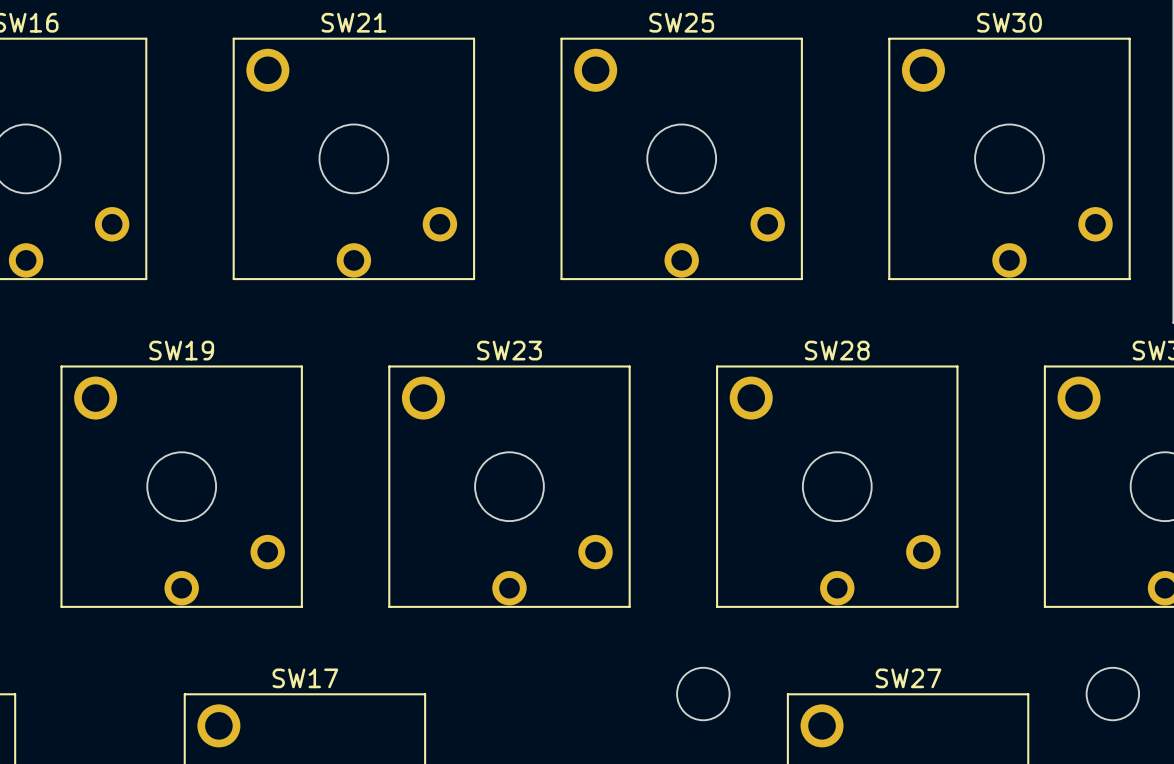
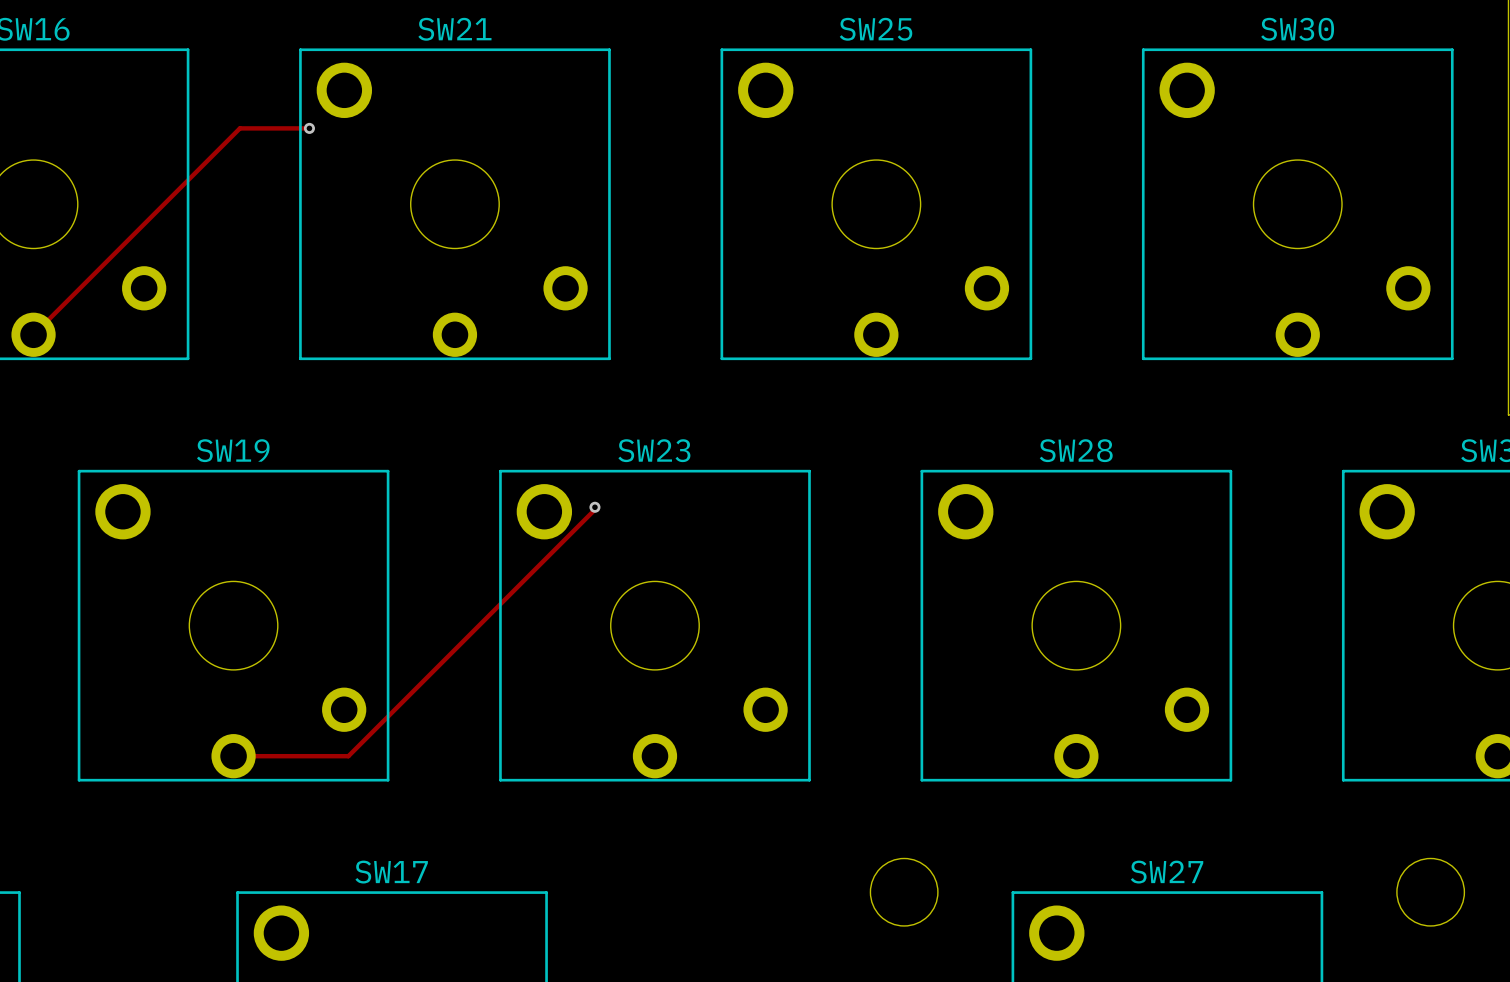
track: none -> (309, 128) (239, 128) (33, 334)
via: none -> (309, 128)
track: none -> (594, 507) (594, 509) (348, 756) (233, 756)
via: none -> (594, 507)

